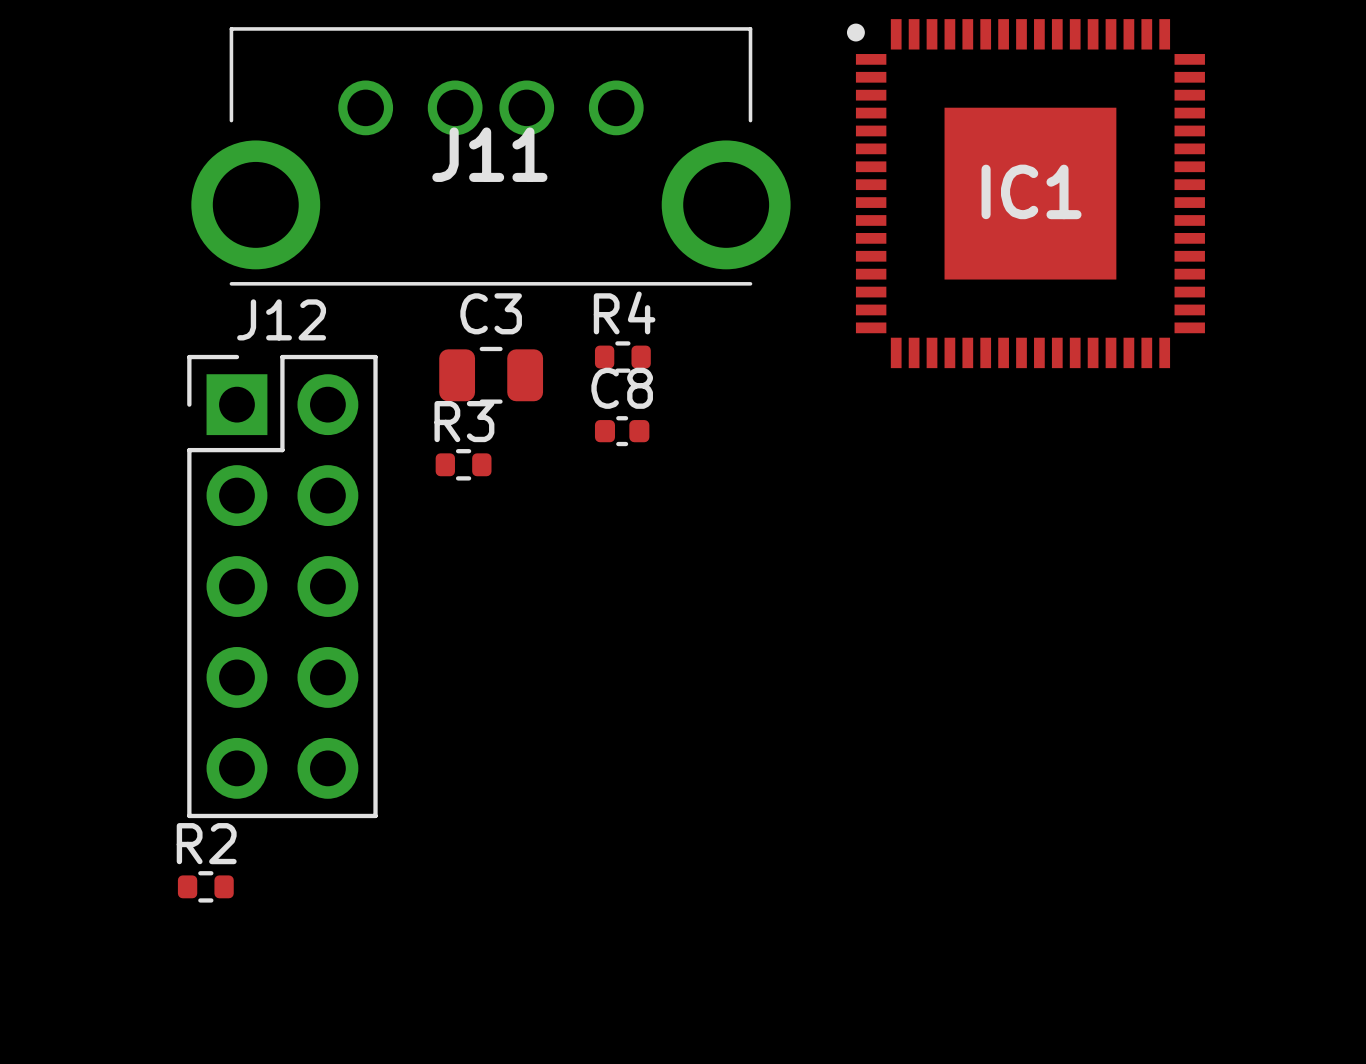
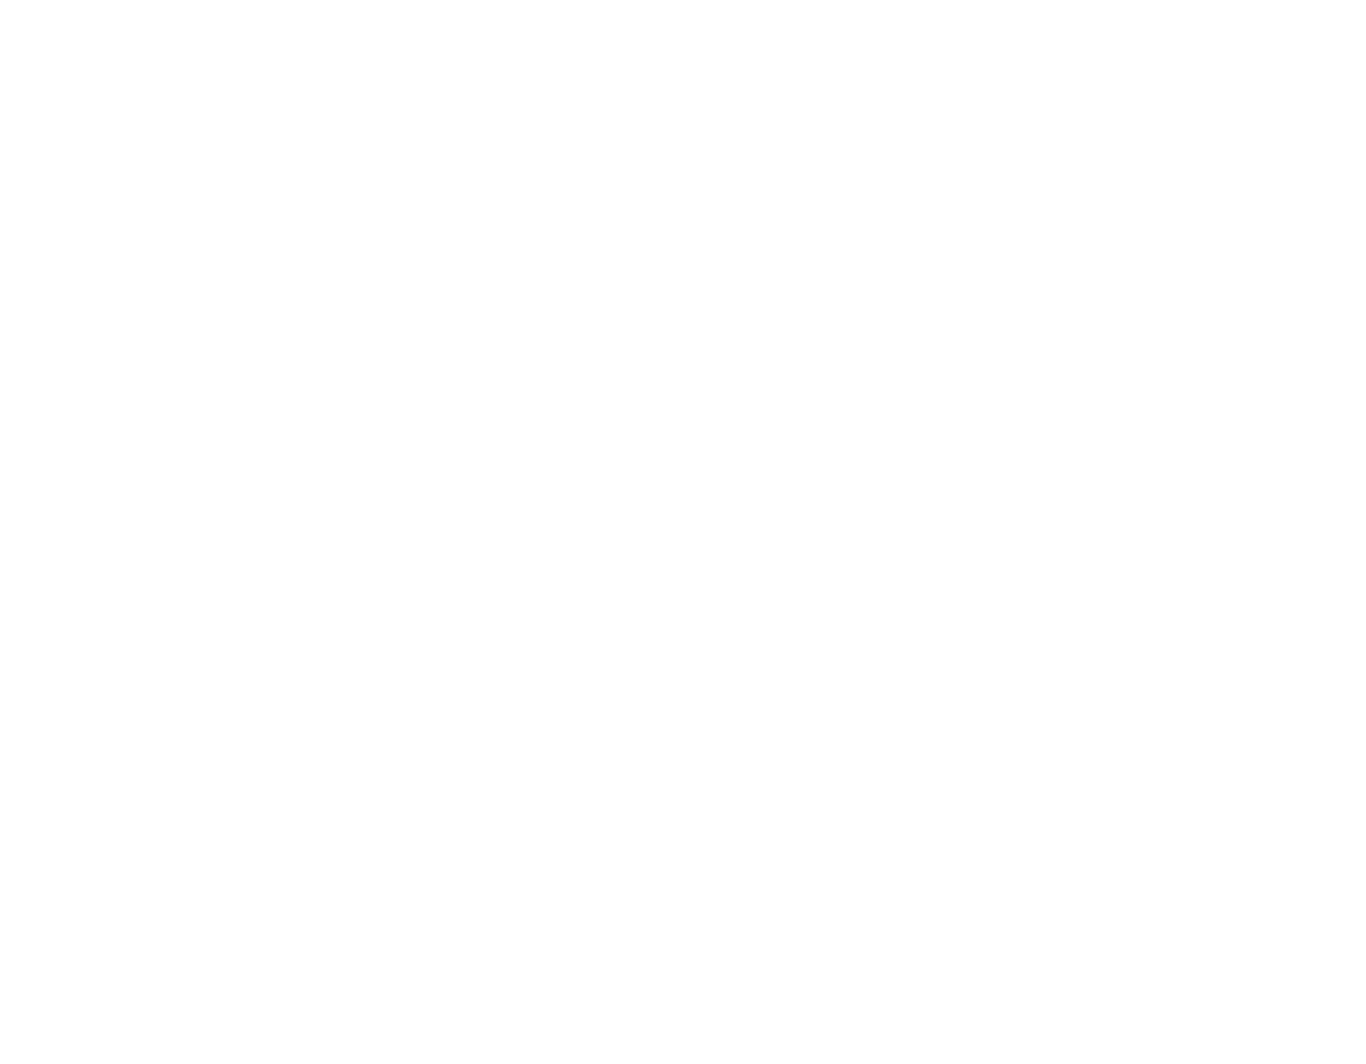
J11: (490, 156) -> none
IC1: (1025, 193) -> none
R4: (622, 357) -> none
C3: (491, 375) -> none
C8: (622, 431) -> none
R3: (463, 464) -> none
J12: (282, 586) -> none
R2: (205, 886) -> none

